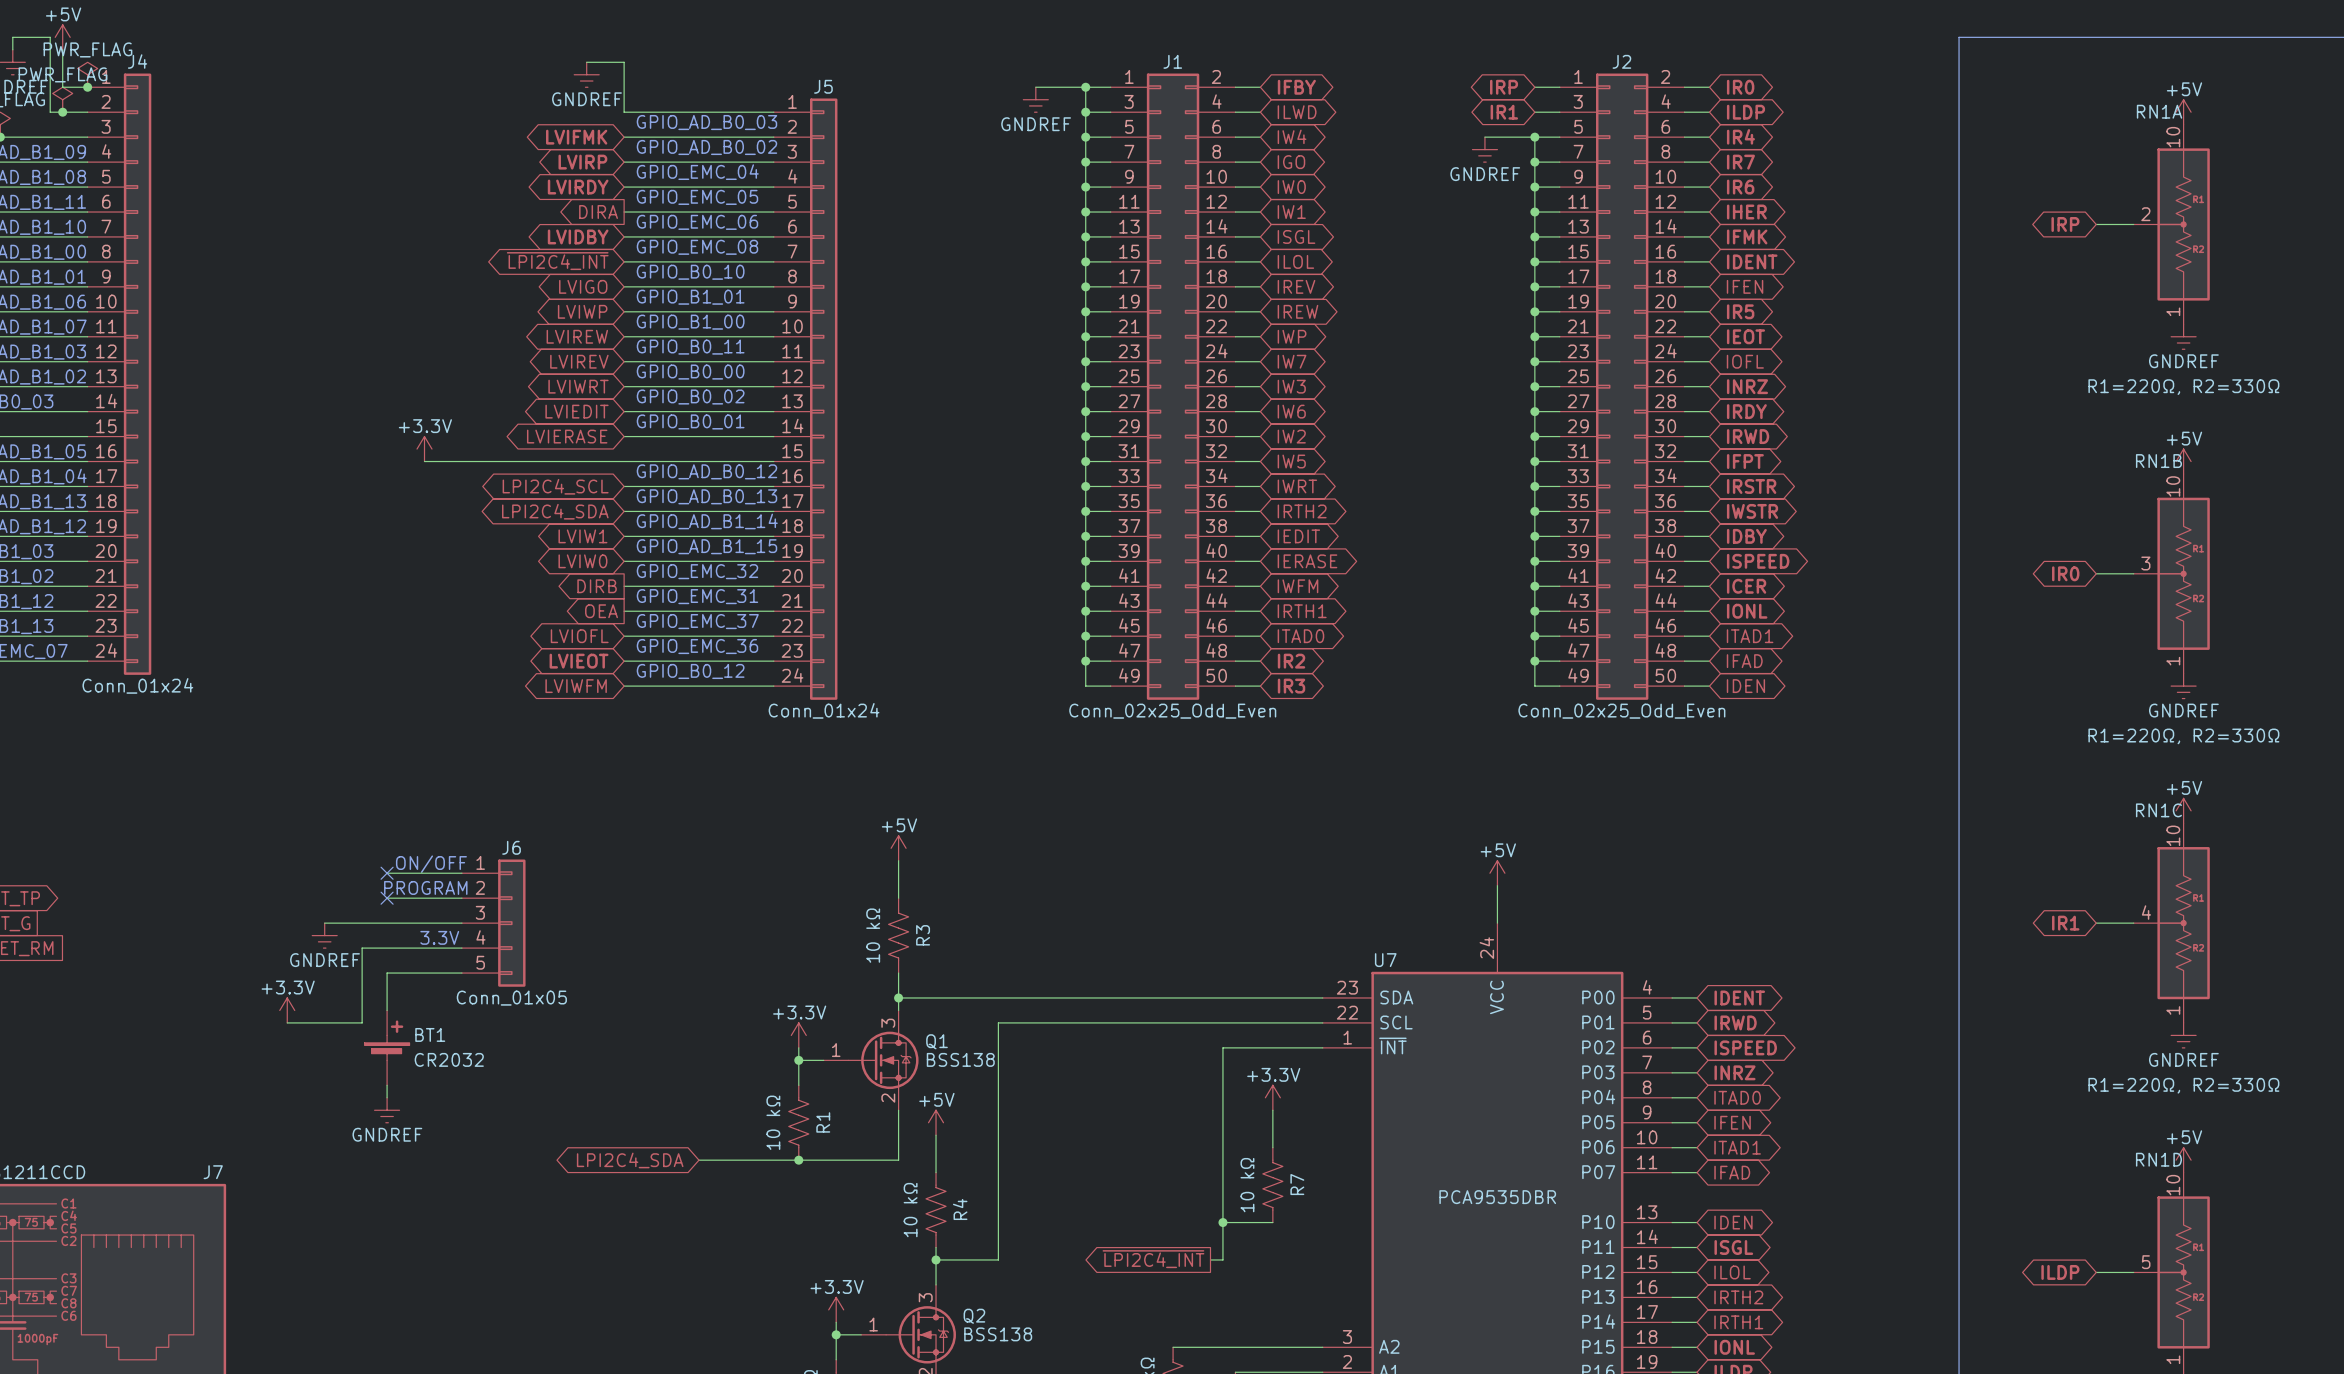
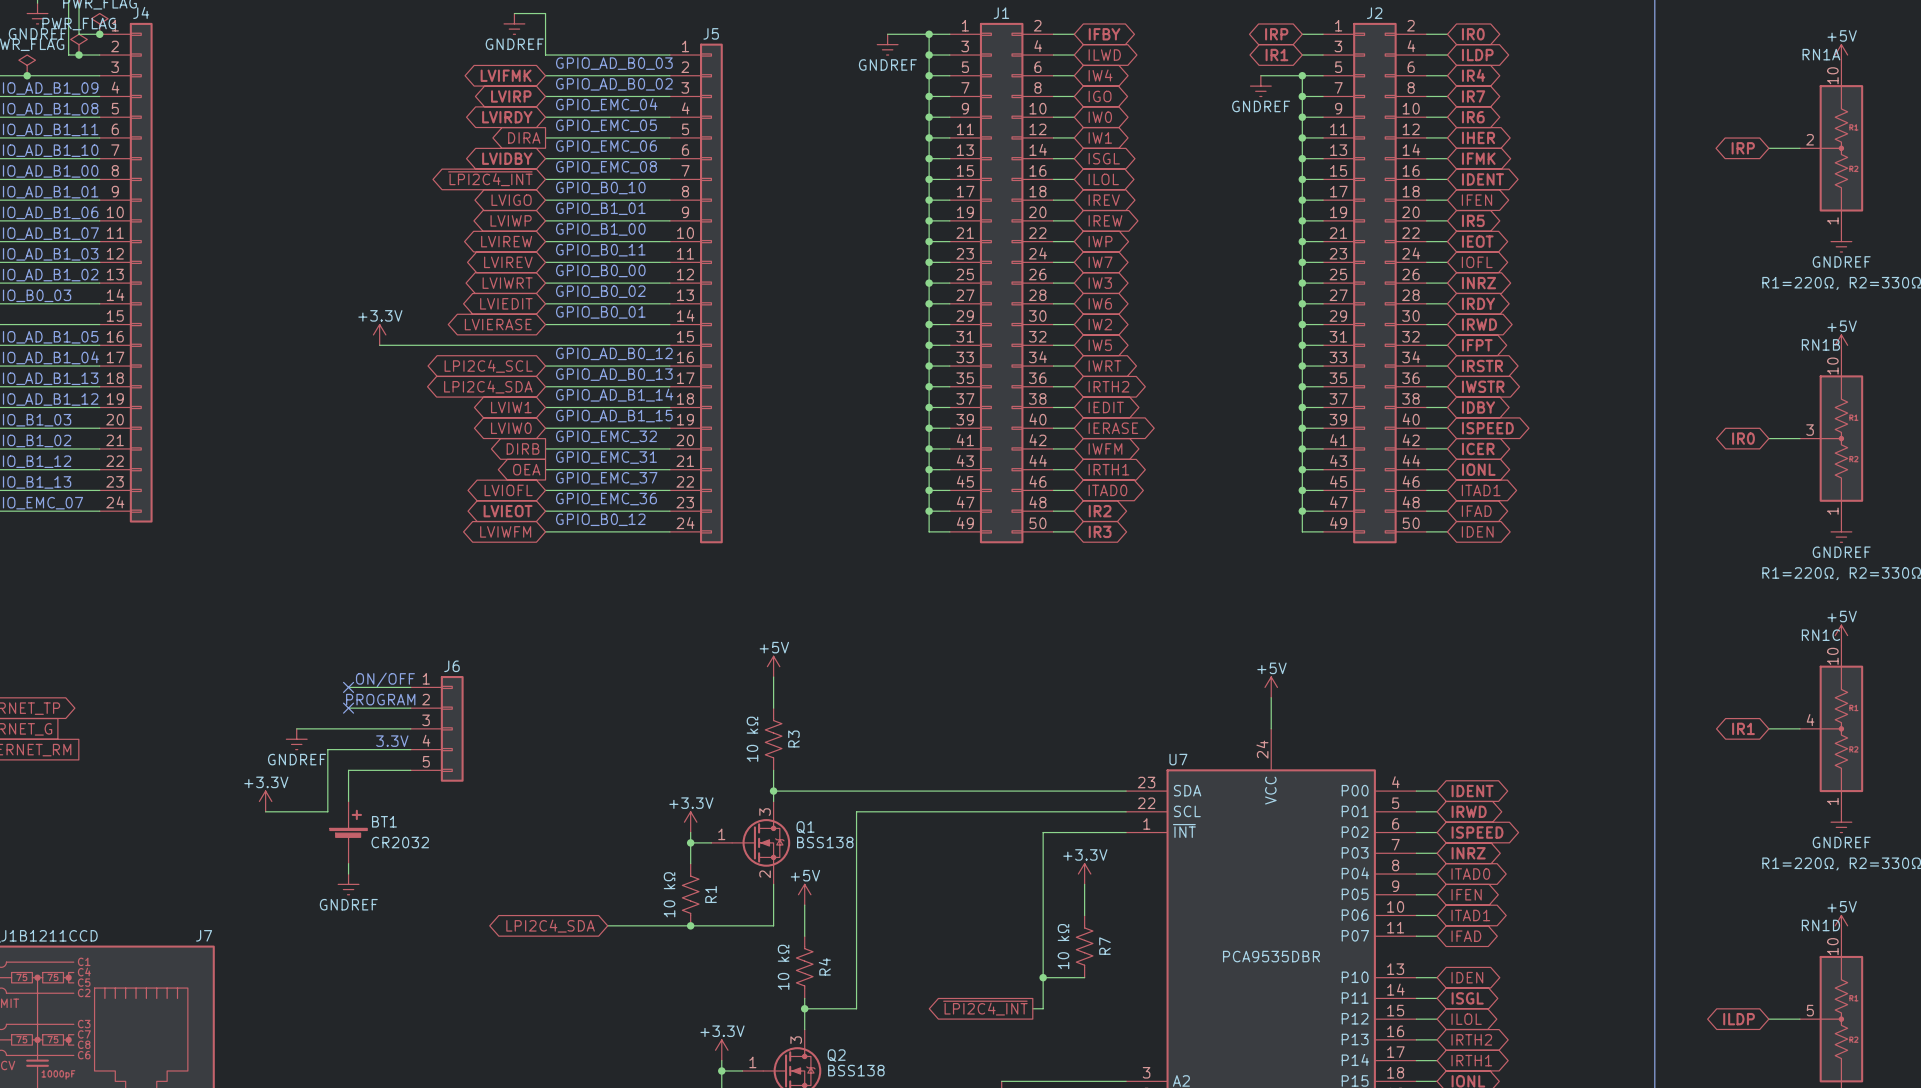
J4 value: Conn_01x24 (137, 685) -> none
J5 value: Conn_01x24 (824, 710) -> none
J1 value: Conn_02x25_Odd_Even (1172, 711) -> none
J2 value: Conn_02x25_Odd_Even (1621, 711) -> none
J6 value: Conn_01x05 (511, 998) -> none

